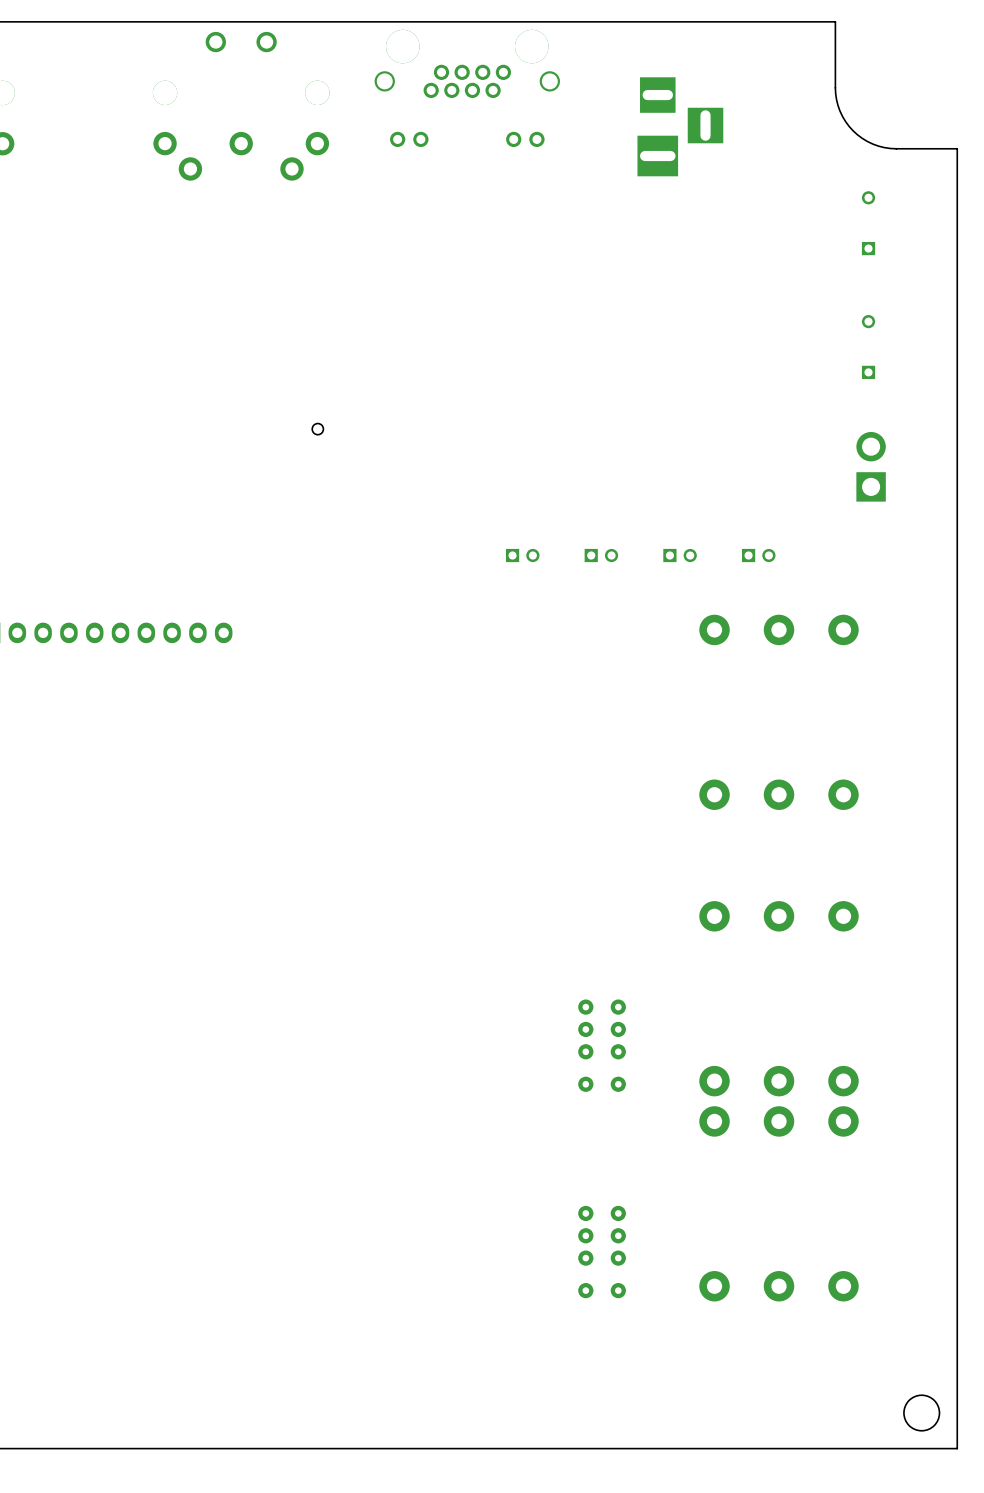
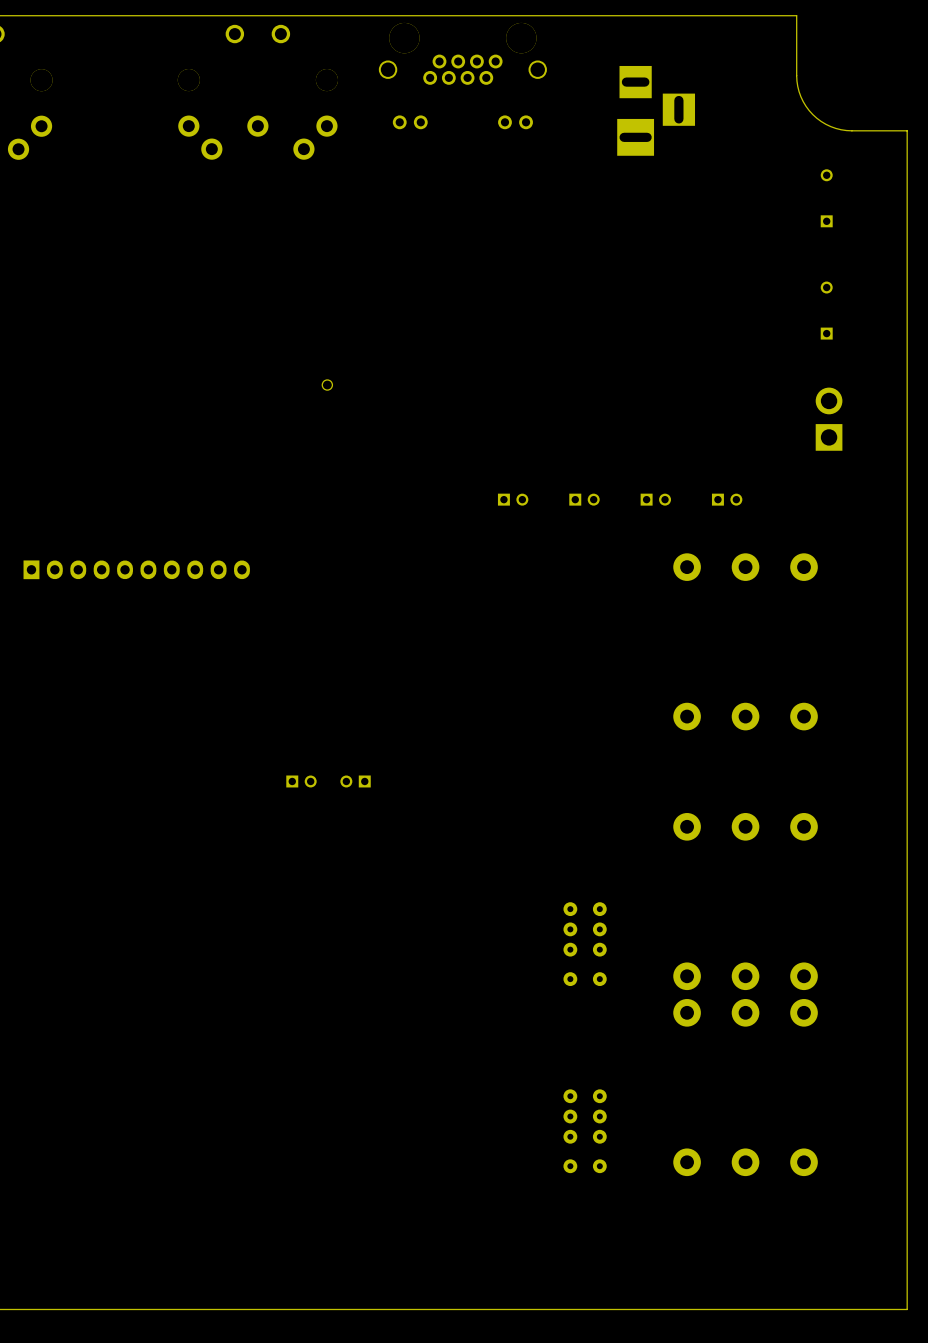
part: none -> (301, 781)
part: none -> (355, 781)
round board edge: [903, 1394, 940, 1432] -> none

